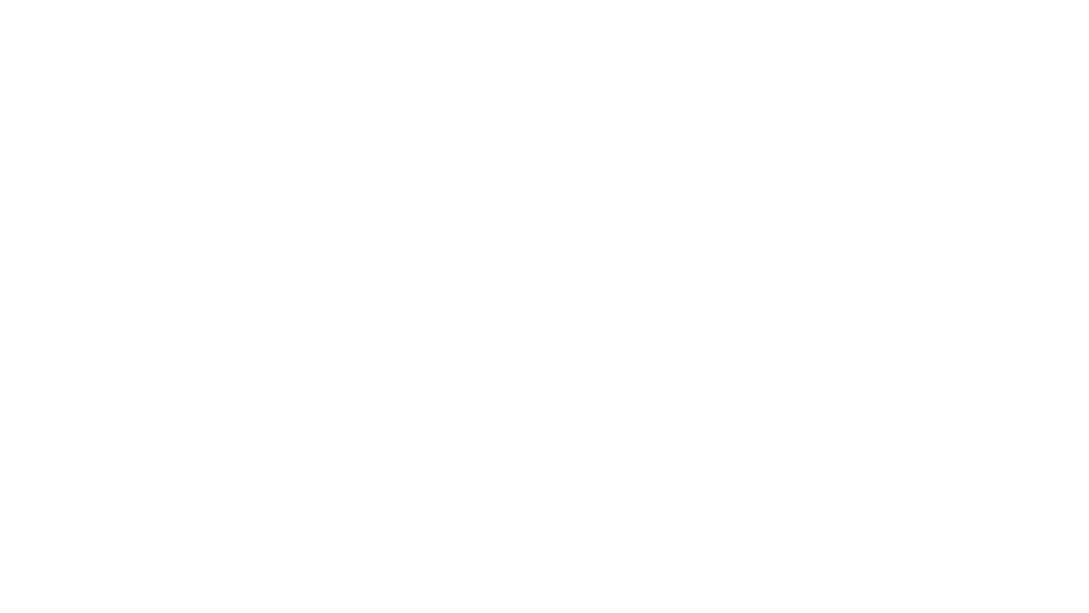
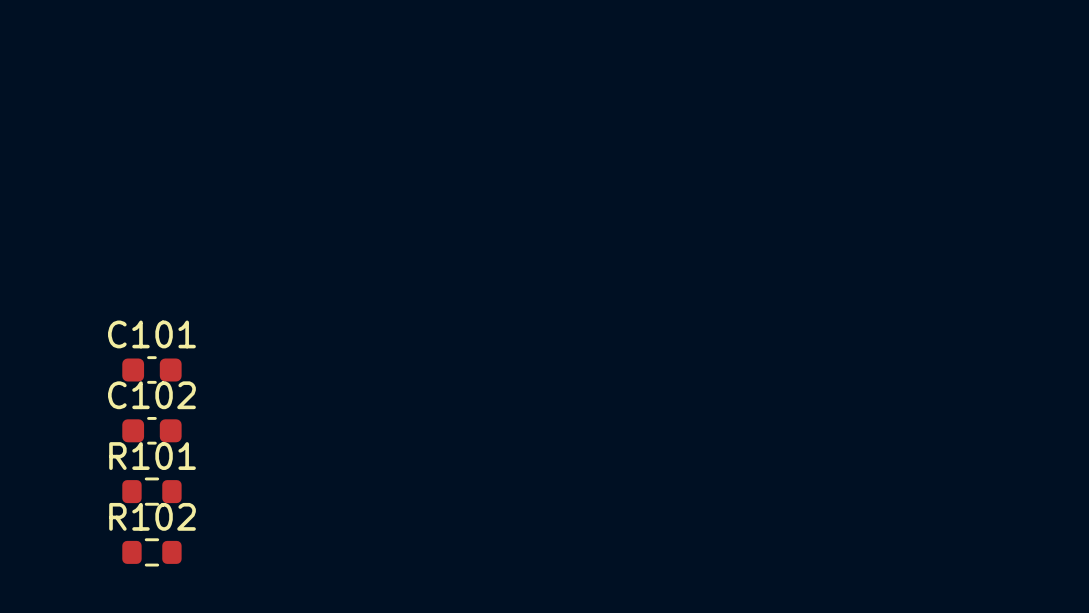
C101: none -> (151, 370)
C102: none -> (151, 430)
R101: none -> (151, 491)
R102: none -> (151, 552)

